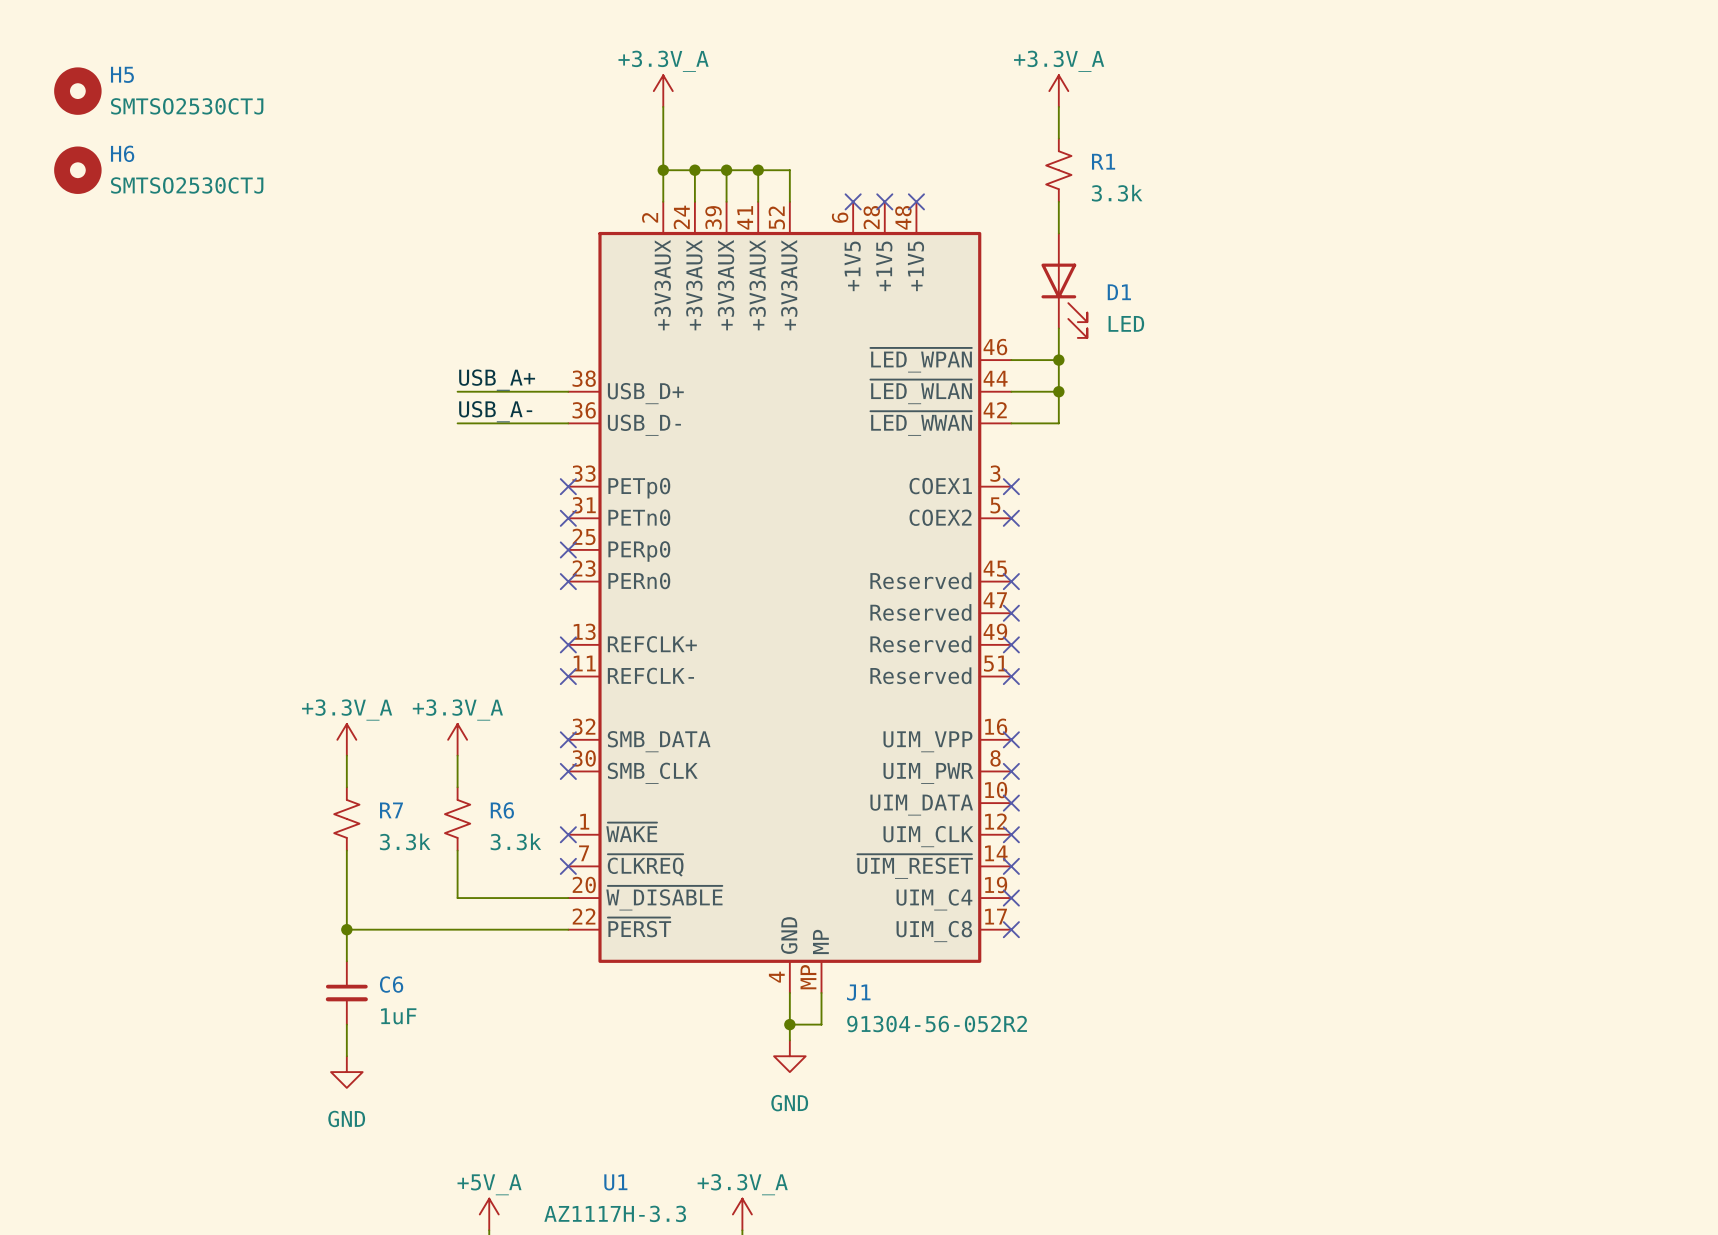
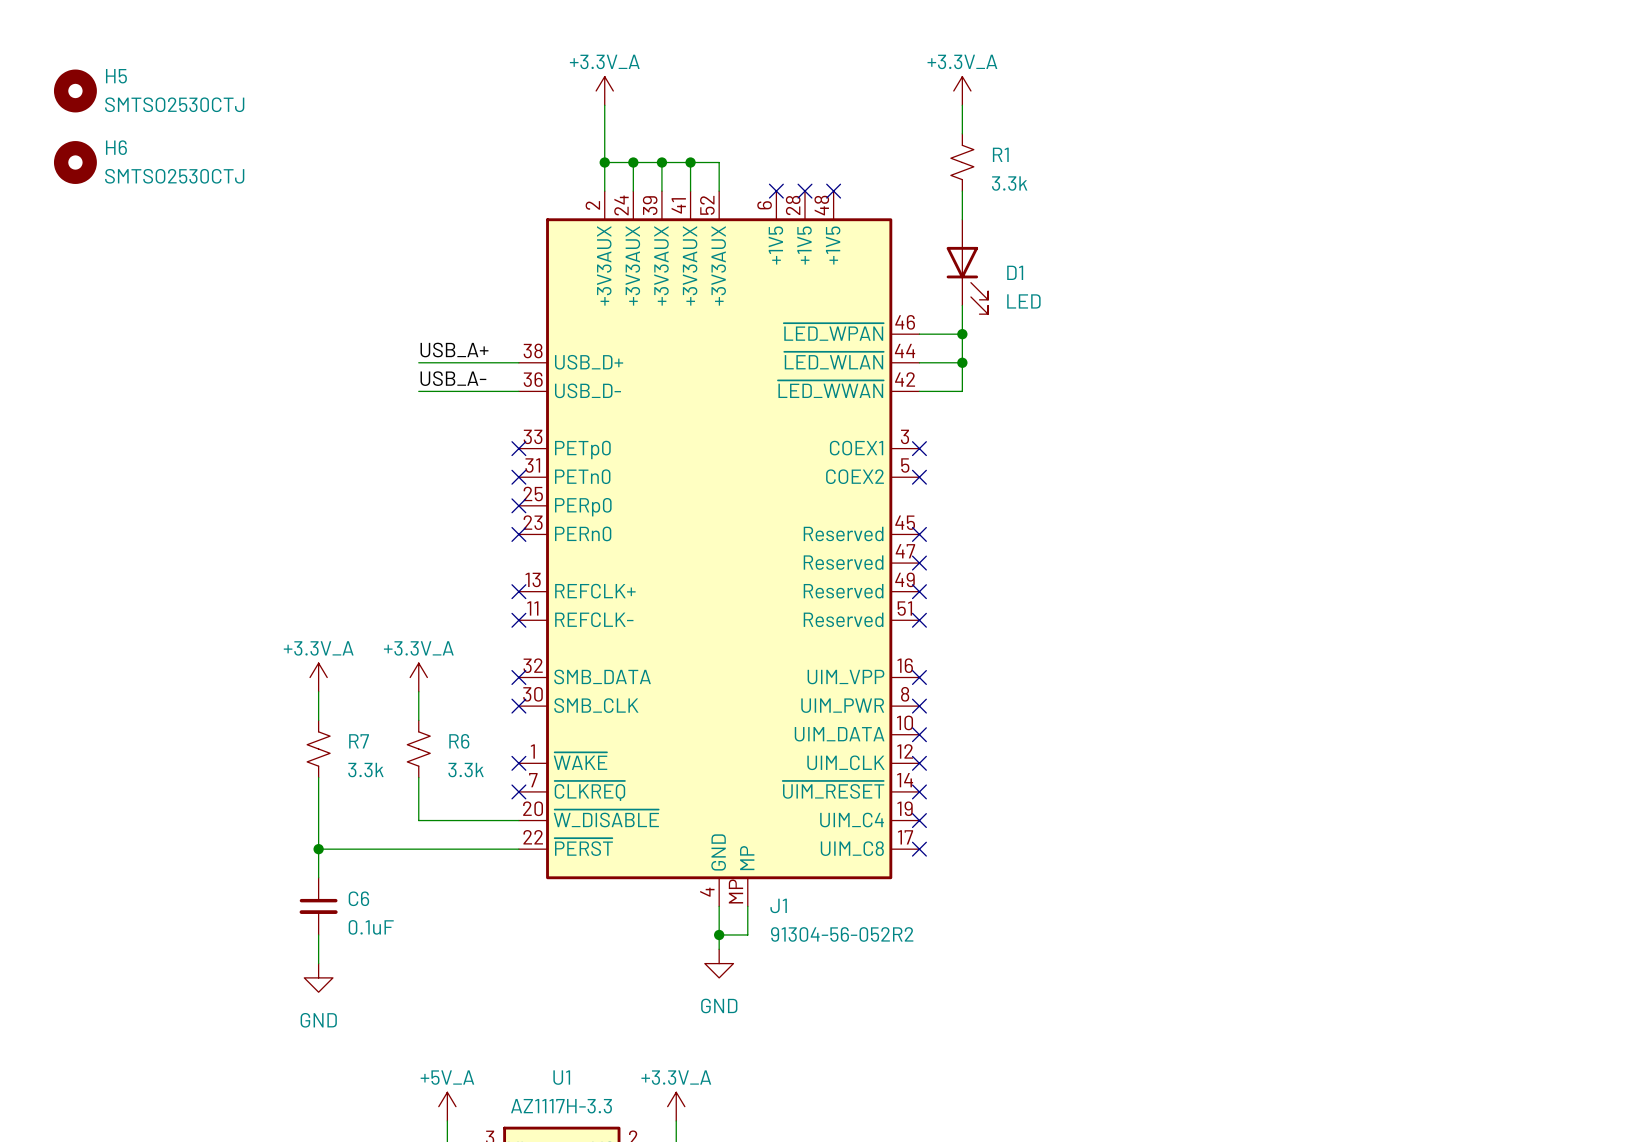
C6 value: 1uF (398, 1016) -> 0.1uF (371, 927)

